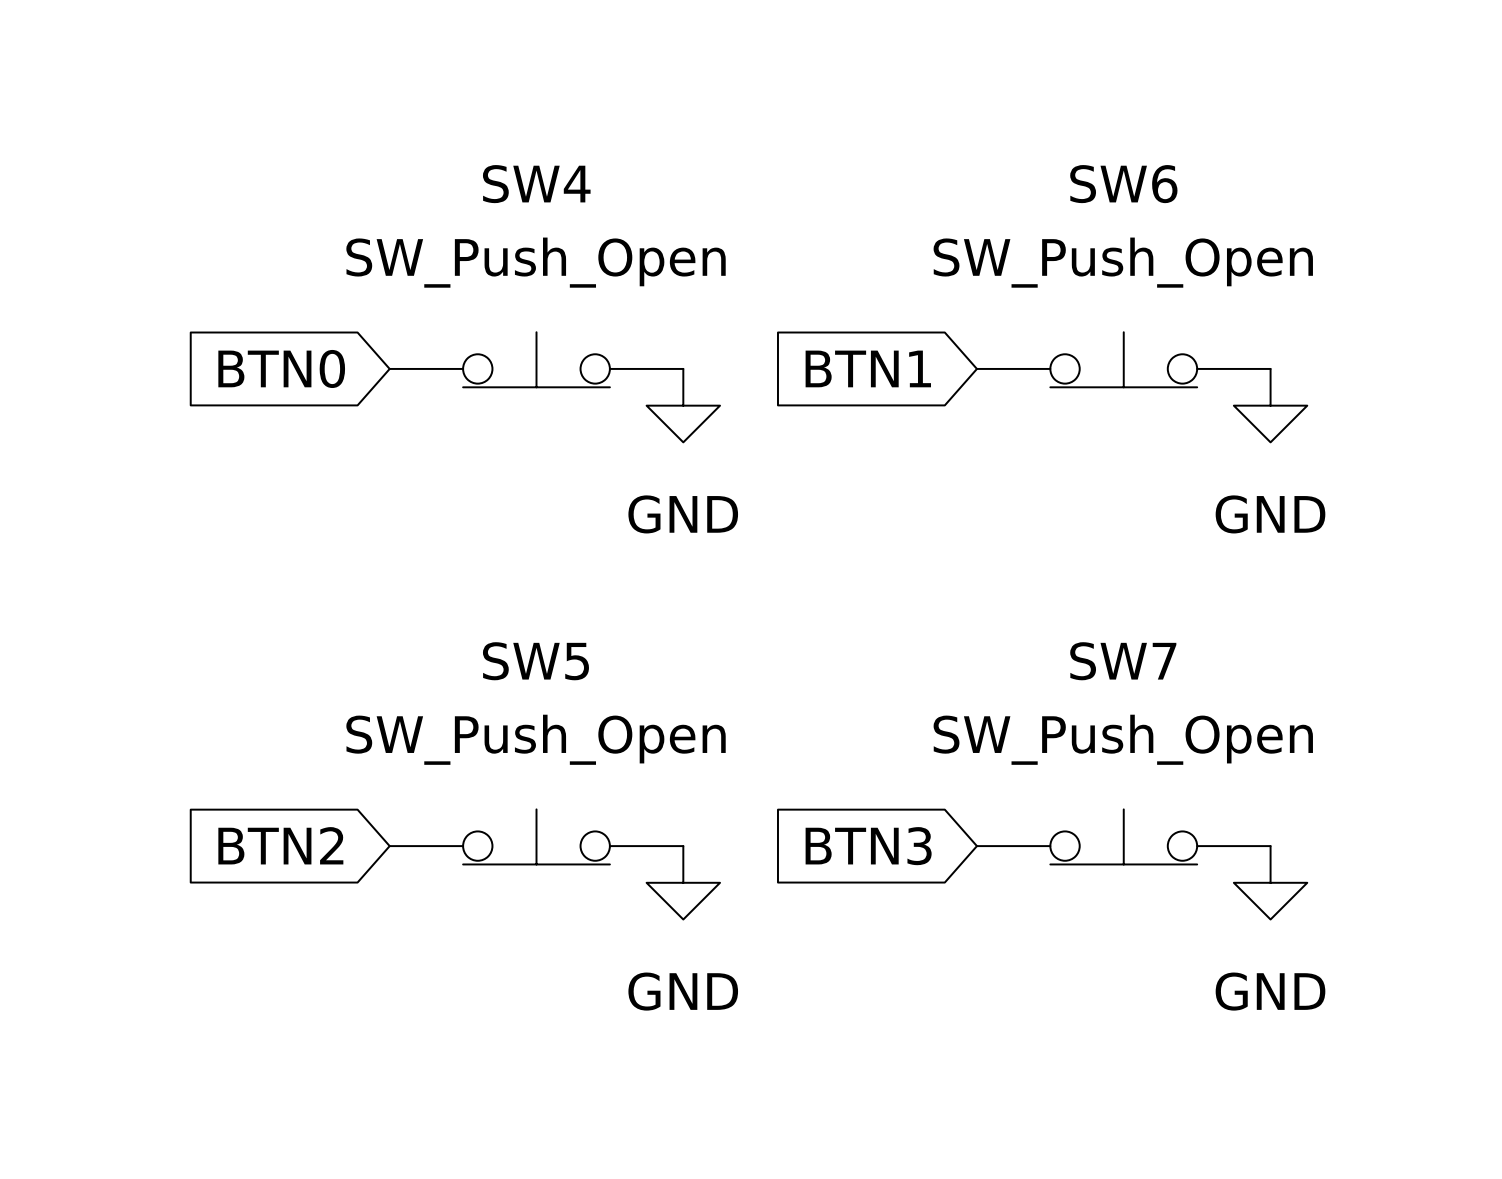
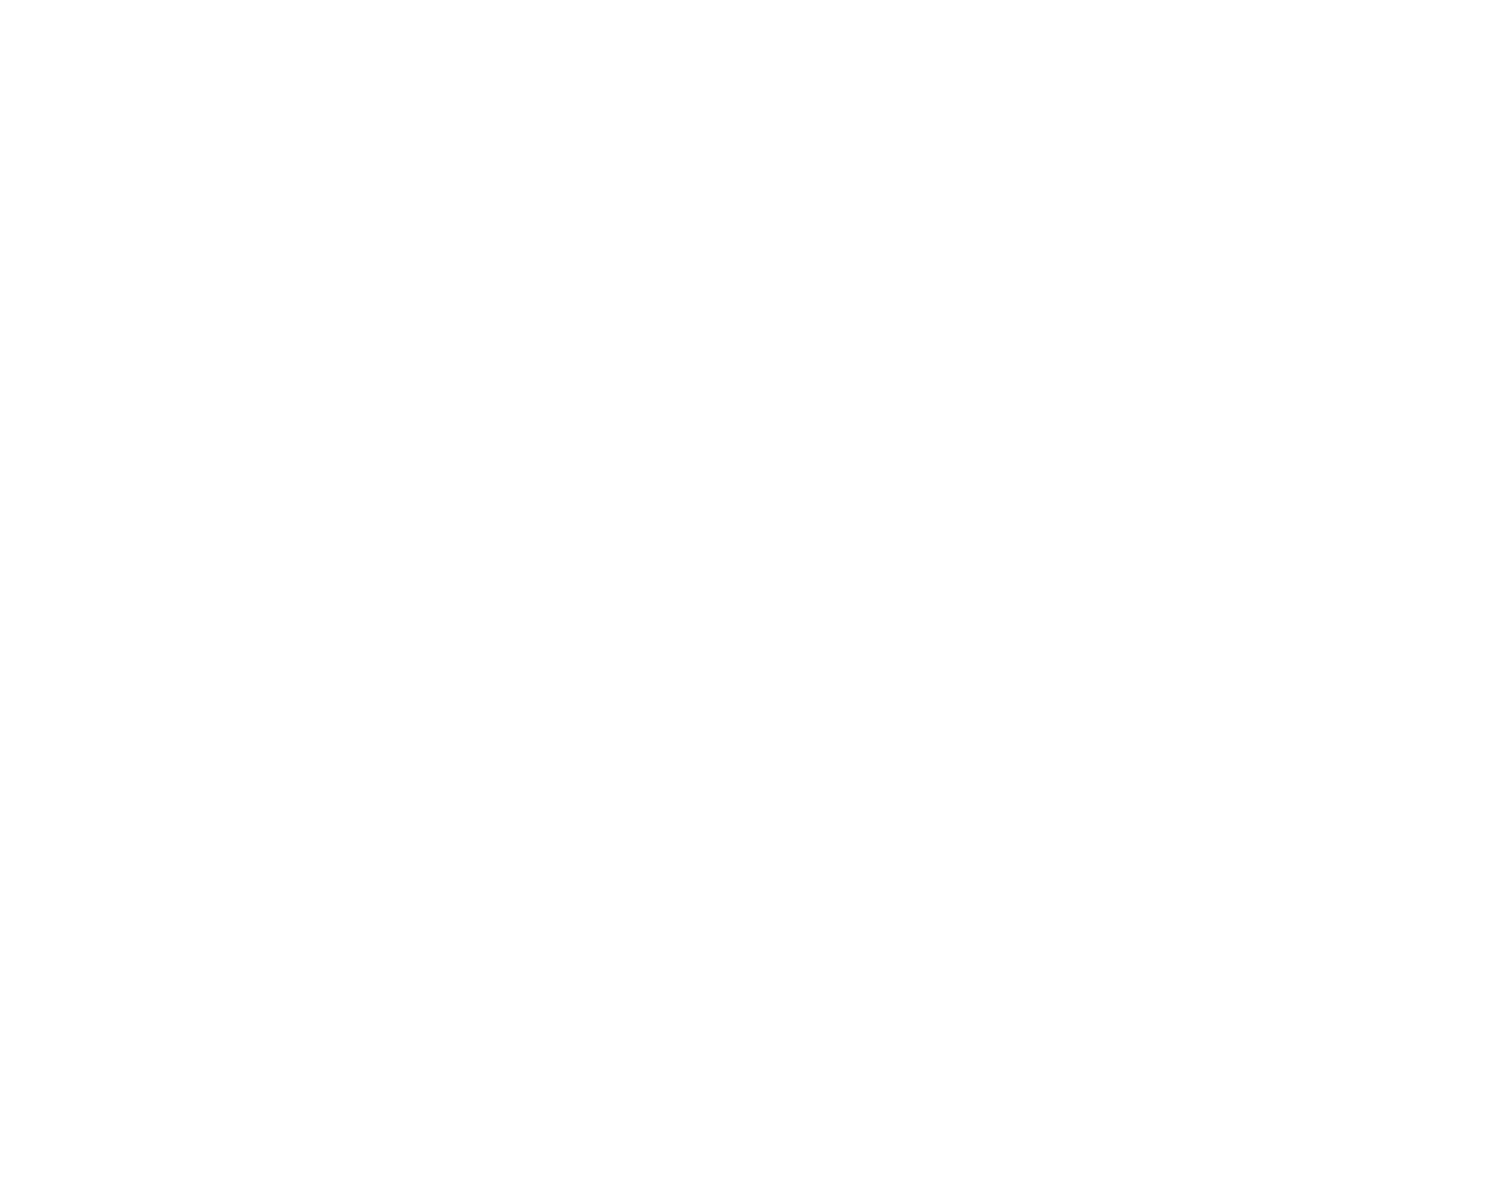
SW4: SW_Push_Open (536, 359) -> none
SW6: SW_Push_Open (1123, 359) -> none
global label: BTN0 (281, 368) -> none
global label: BTN1 (868, 368) -> none
power symbol: GND (683, 405) -> none
power symbol: GND (1270, 405) -> none
SW5: SW_Push_Open (536, 836) -> none
SW7: SW_Push_Open (1123, 836) -> none
global label: BTN2 (280, 845) -> none
global label: BTN3 (868, 846) -> none
power symbol: GND (683, 882) -> none
power symbol: GND (1270, 882) -> none

